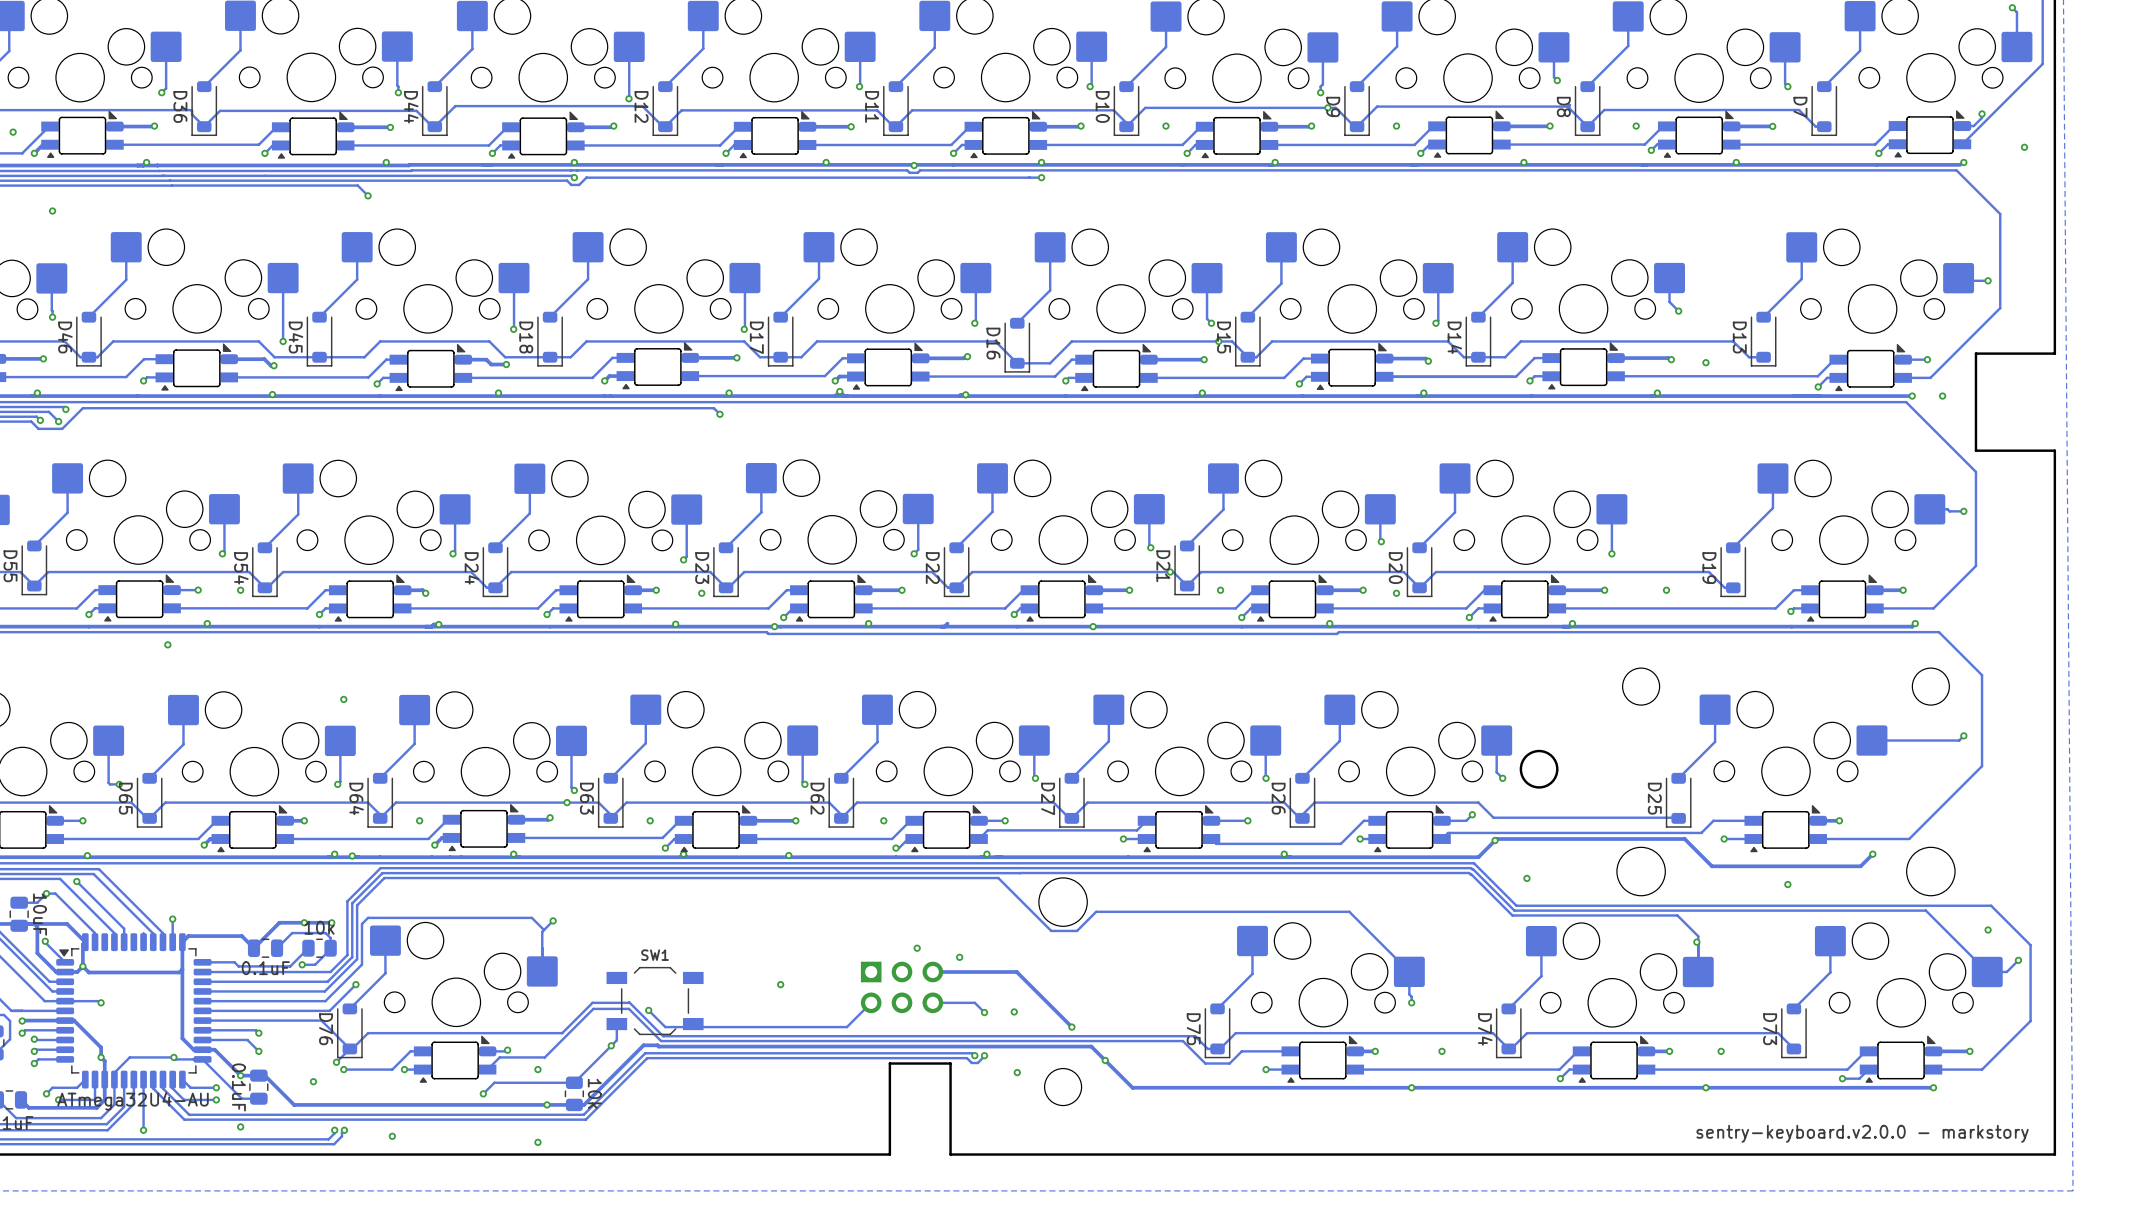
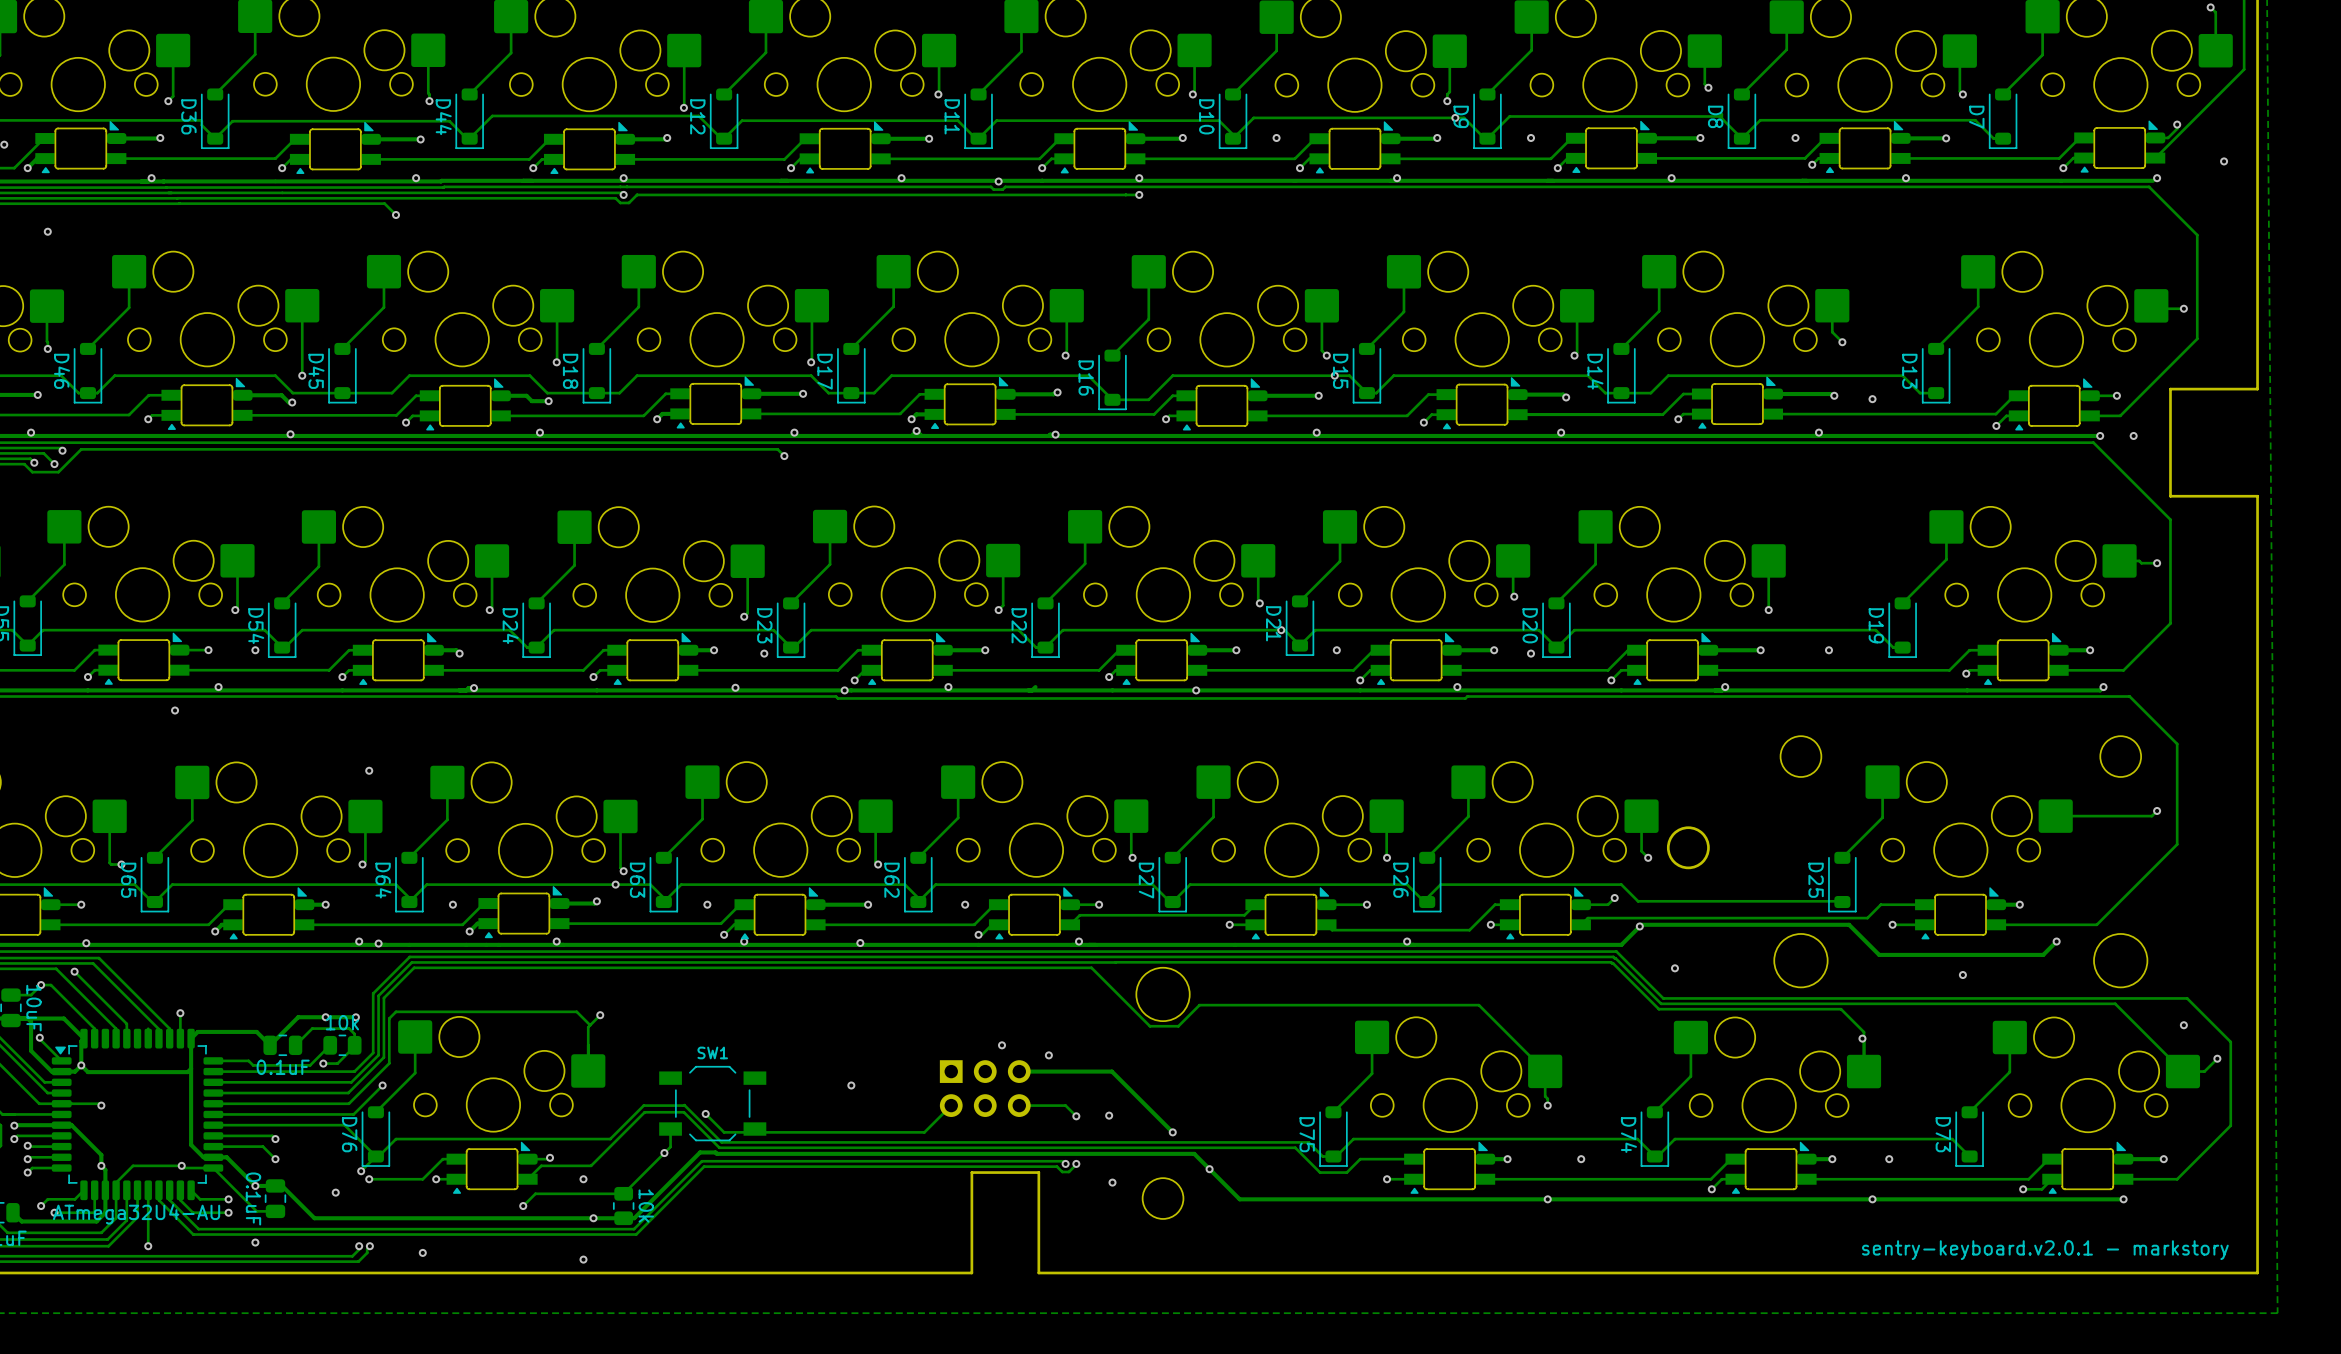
text: sentry-keyboard.v2.0.0 - markstory (1862, 1133) -> sentry-keyboard.v2.0.1 - markstory (2045, 1250)

